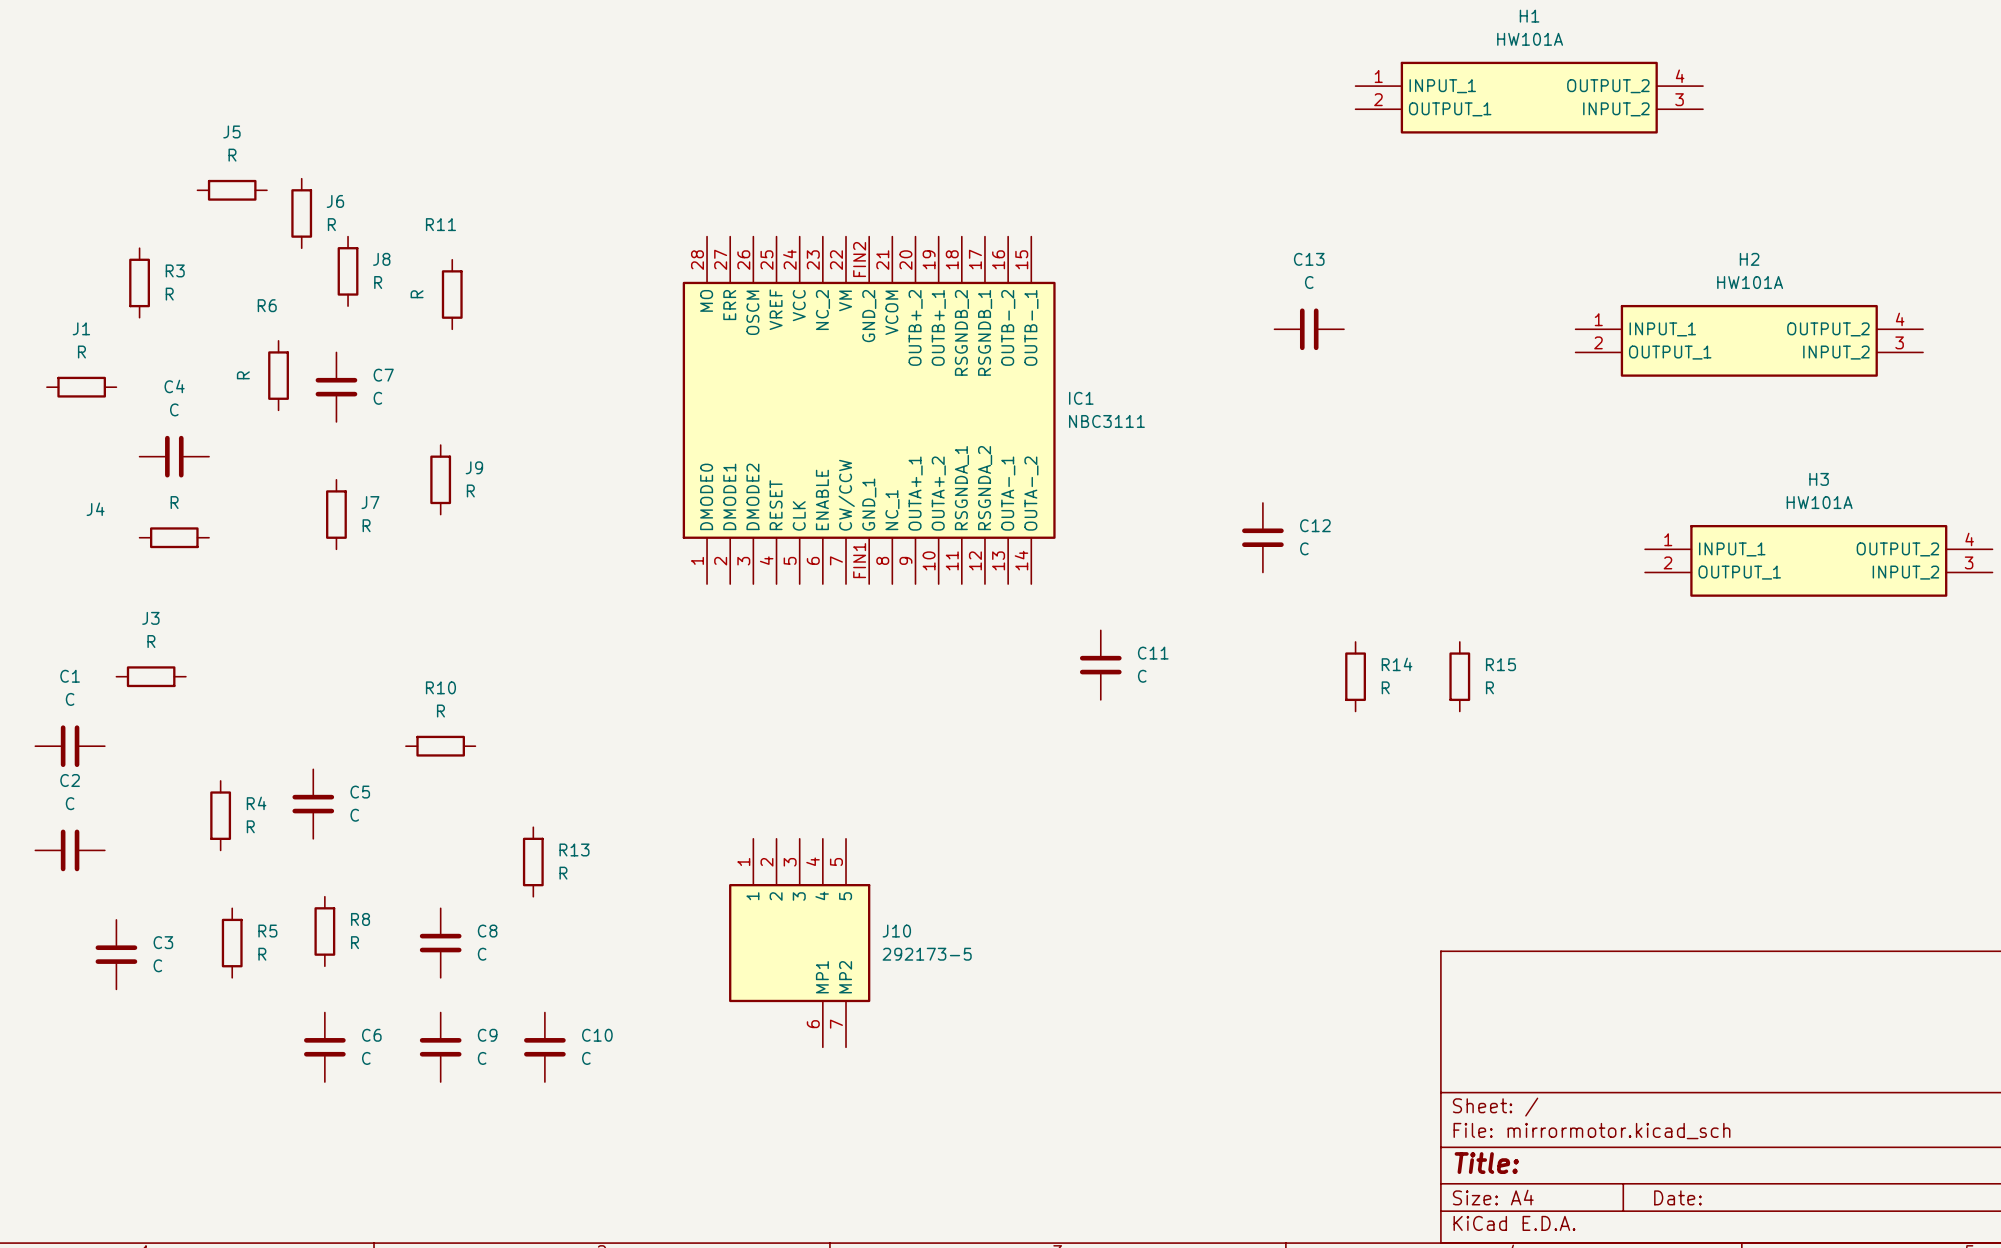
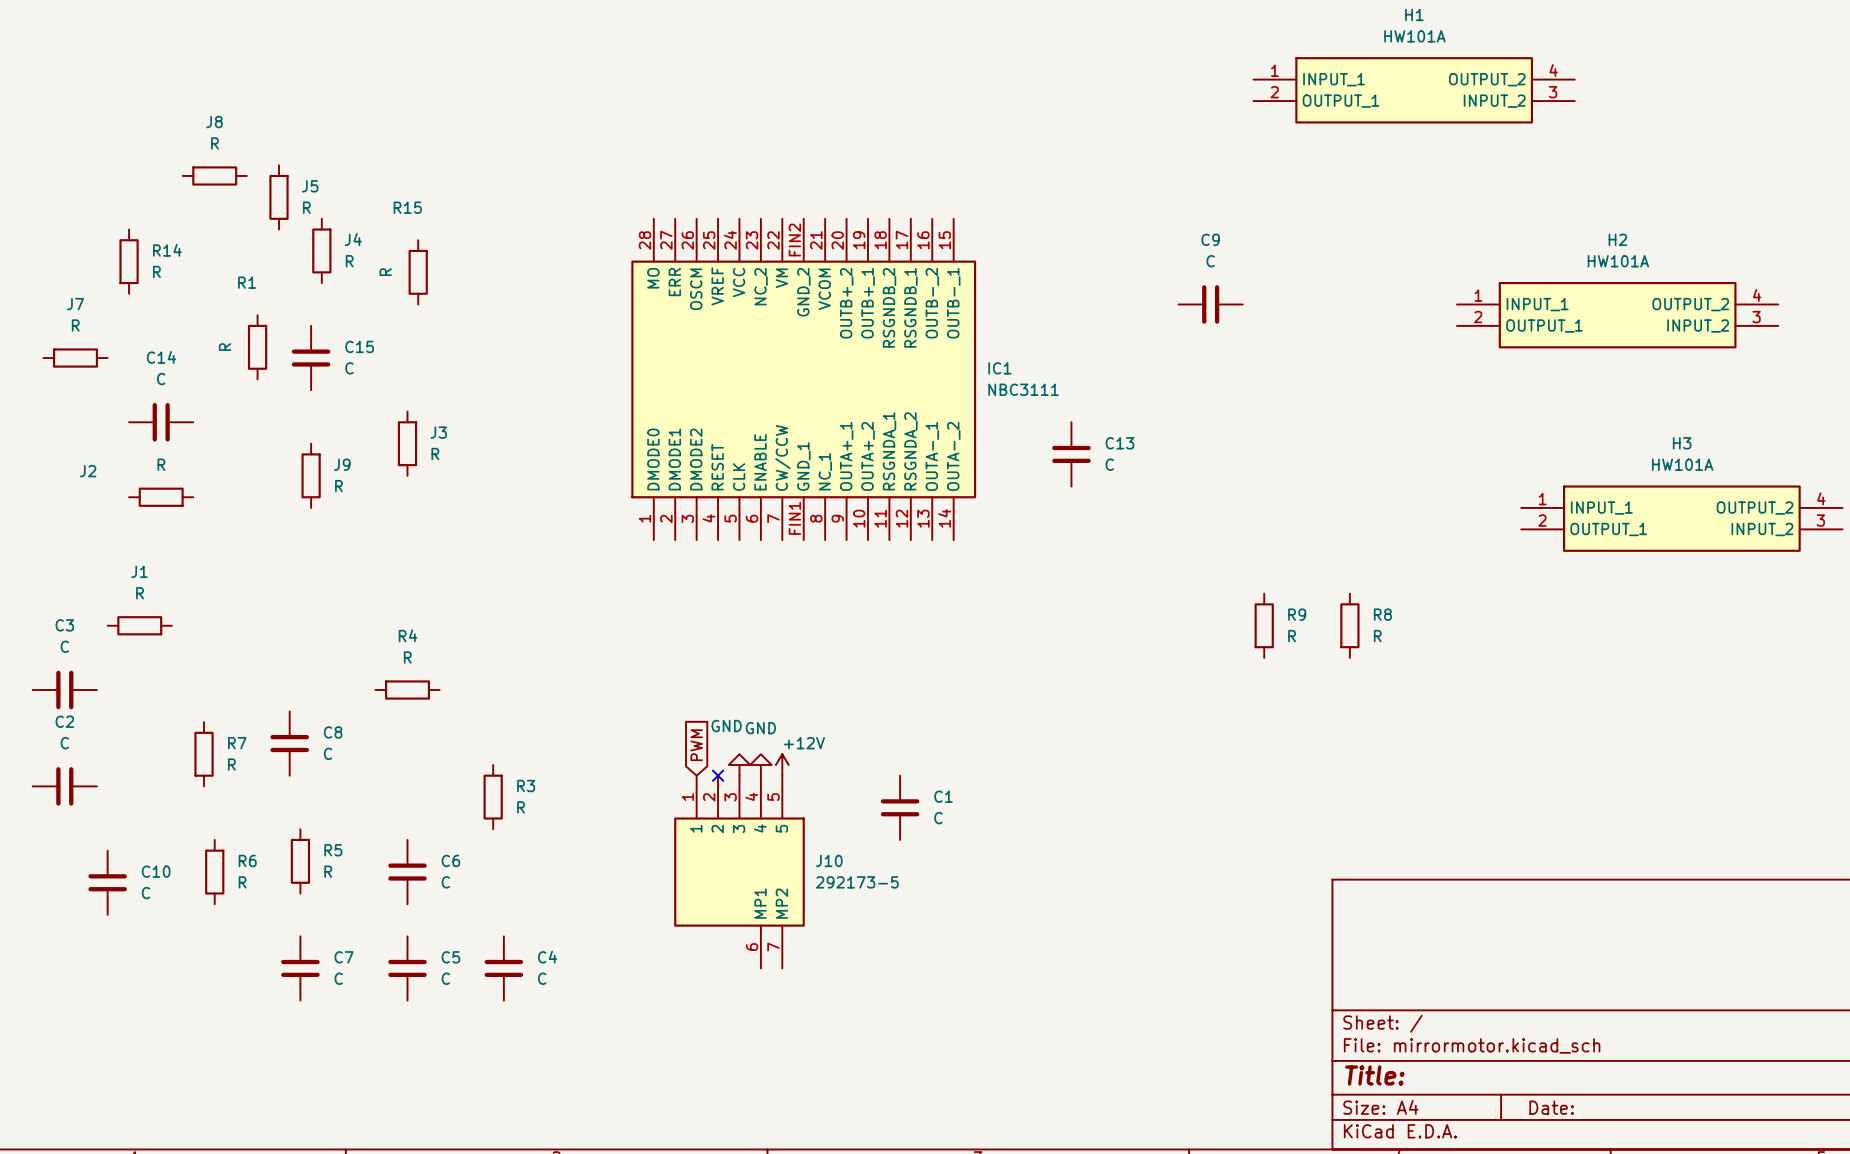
J5 name: J5 (231, 131) -> J8 (214, 122)
J6 name: J6 (335, 201) -> J5 (310, 186)
R11 name: R11 (440, 224) -> R15 (407, 207)
J8 name: J8 (381, 259) -> J4 (353, 239)
C13 name: C13 (1309, 259) -> C9 (1210, 239)
R3 name: R3 (175, 270) -> R14 (167, 250)
R6 name: R6 (267, 305) -> R1 (247, 282)
J1 name: J1 (81, 328) -> J7 (75, 304)
C7 name: C7 (383, 375) -> C15 (359, 346)
C4 name: C4 (174, 386) -> C14 (161, 357)
J9 name: J9 (474, 467) -> J3 (438, 432)
C13: none -> C (1071, 454)
J7 name: J7 (370, 502) -> J9 (342, 464)
J4 name: J4 (95, 509) -> J2 (88, 471)
C12: C (1262, 537) -> none
J3 name: J3 (150, 618) -> J1 (139, 571)
R15 name: R15 (1500, 664) -> R8 (1382, 614)
C11: C (1100, 665) -> none
C1 name: C1 (70, 676) -> C3 (64, 625)
R14: R (1355, 676) -> none
R9: none -> R (1264, 625)
R10 name: R10 (440, 687) -> R4 (408, 635)
C5 name: C5 (360, 792) -> C8 (333, 732)
R4 name: R4 (256, 803) -> R7 (237, 743)
global label: none -> PWM (696, 745)
power symbol: none -> GND (739, 764)
power symbol: none -> GND (760, 764)
power symbol: none -> +12V (782, 764)
no-connect mark: none -> (718, 775)
R13 name: R13 (574, 849) -> R3 (526, 785)
C1: none -> C (900, 807)
R8 name: R8 (360, 919) -> R5 (333, 850)
R5 name: R5 (267, 931) -> R6 (247, 860)
C8 name: C8 (487, 931) -> C6 (450, 860)
C3 name: C3 (163, 942) -> C10 (156, 871)
C6 name: C6 (371, 1035) -> C7 (344, 957)
C9 name: C9 (487, 1035) -> C5 (450, 957)
C10 name: C10 (597, 1035) -> C4 (547, 957)

